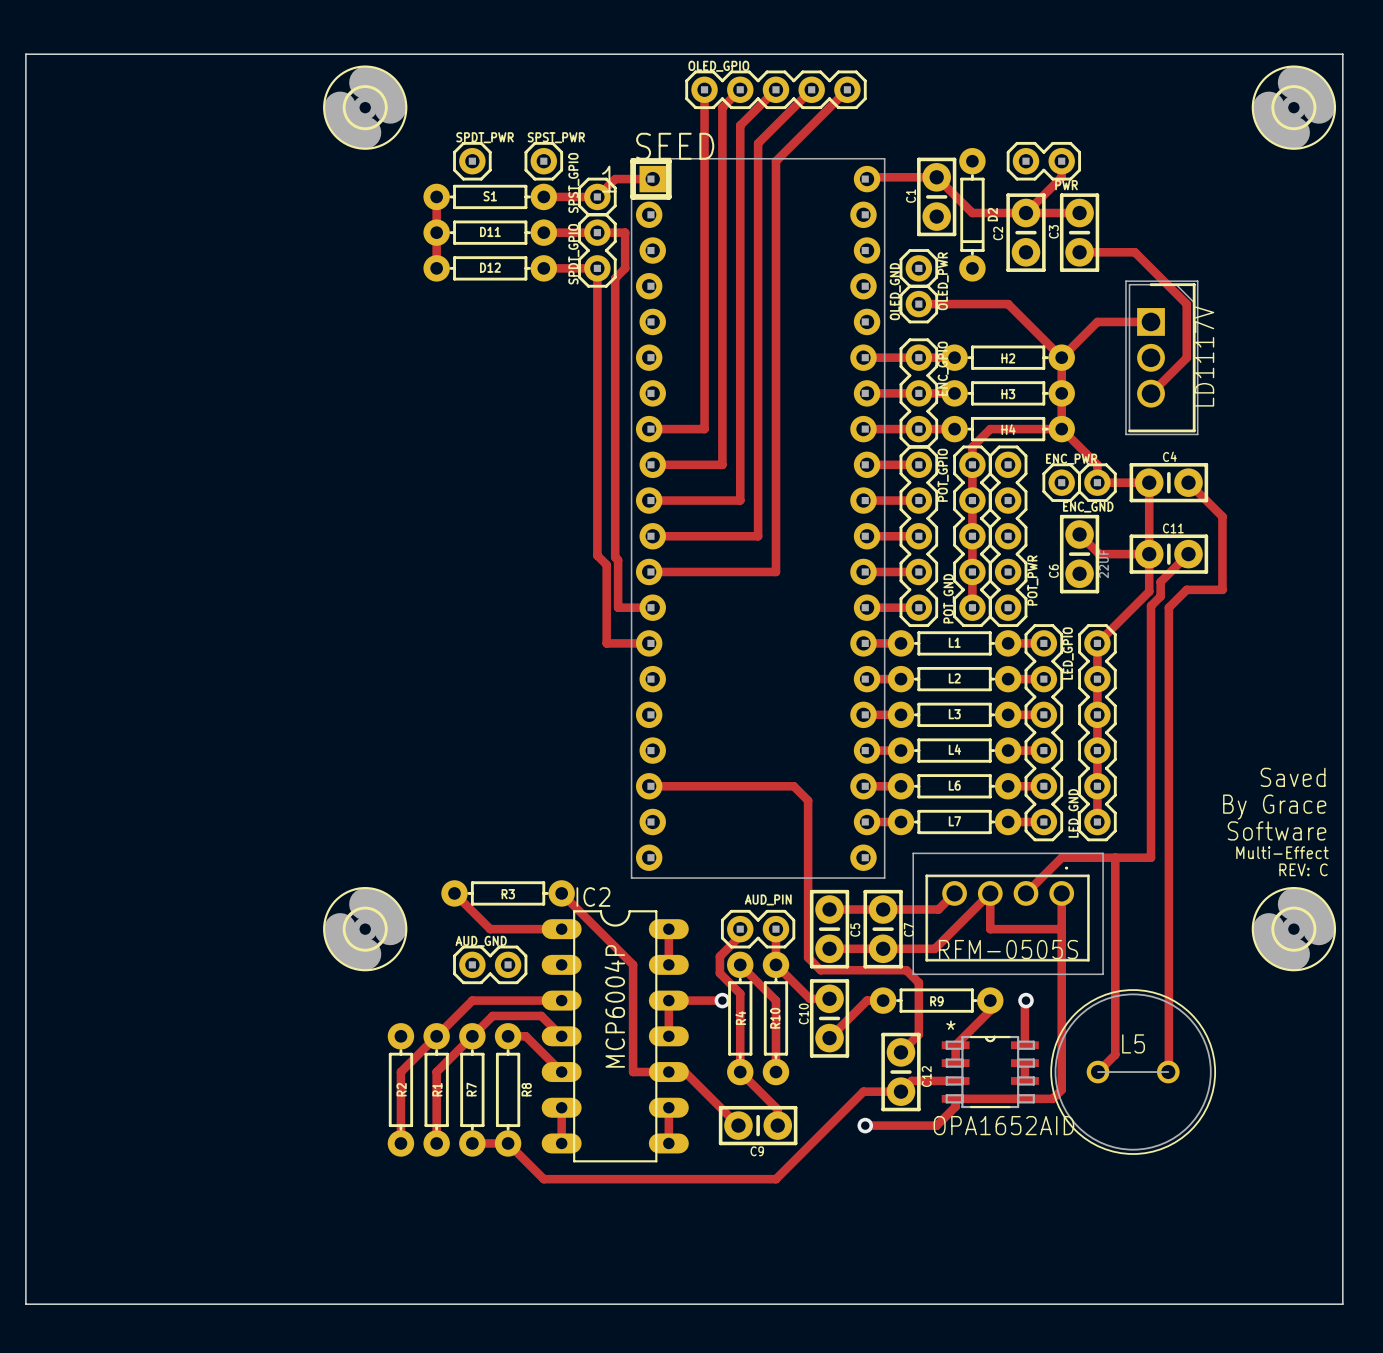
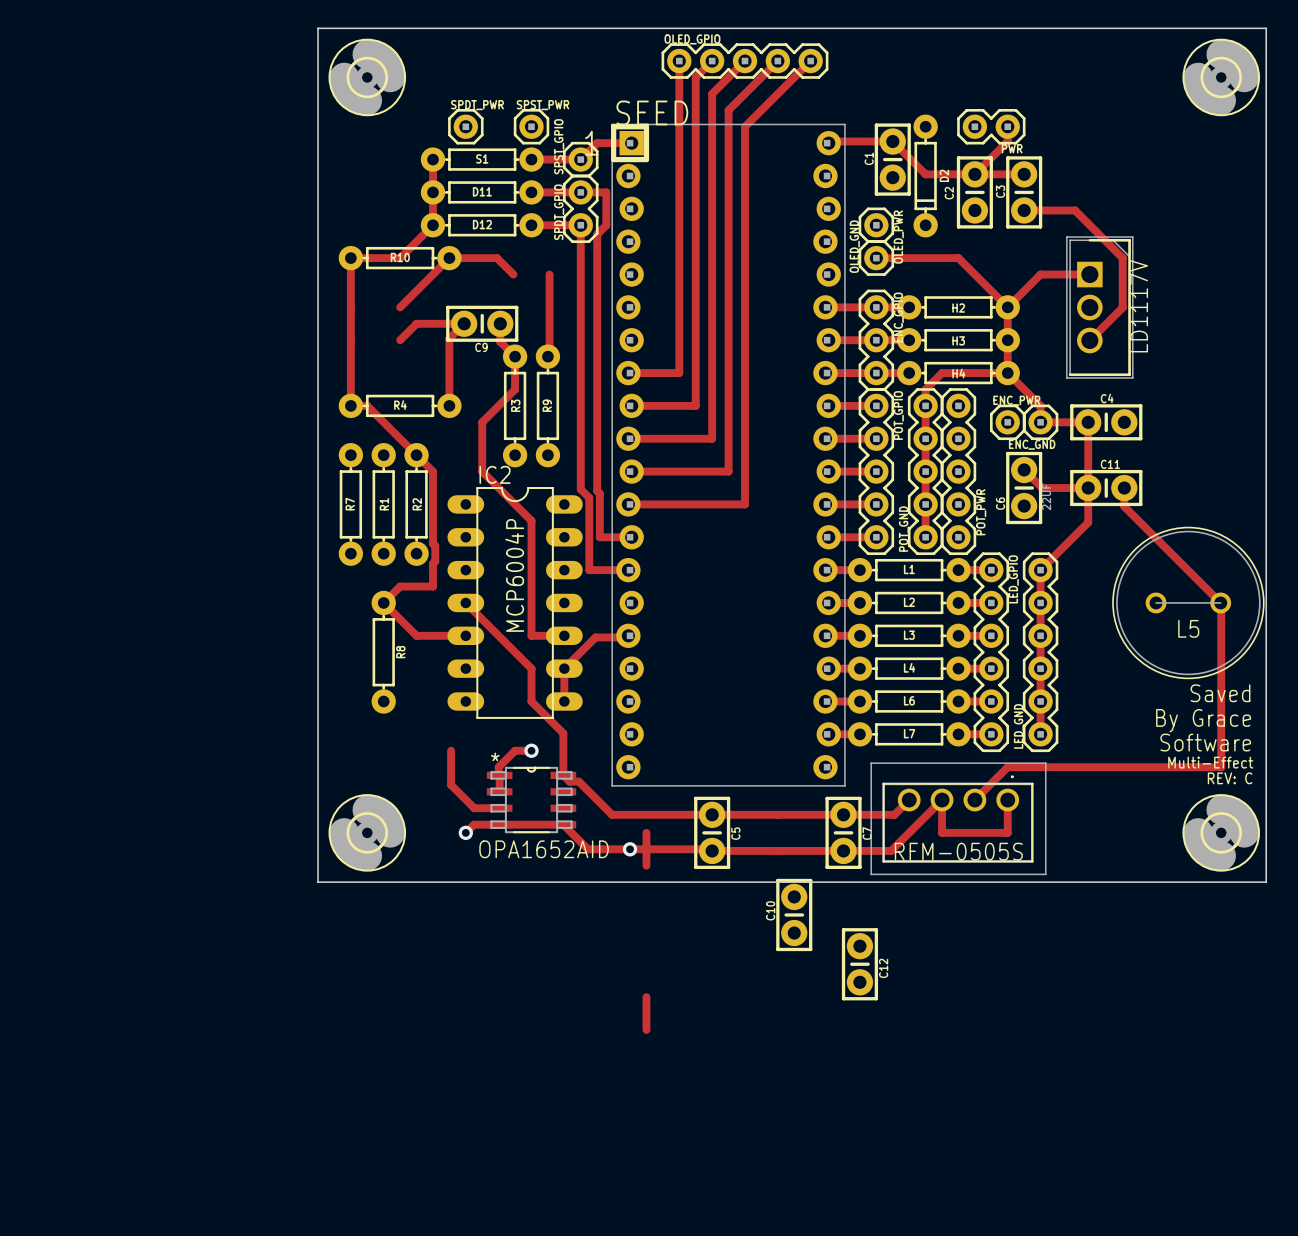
board edge: (311, 54) (25, 54) (25, 1304) (1342, 1304) (1342, 982) -> (318, 28) (318, 882) (1266, 882)
track: none -> (432, 225) (400, 258) (350, 258) (350, 405) (367, 405) (432, 471) (432, 543) (435, 545) (432, 586) (400, 586) (383, 602) (416, 635) (465, 635)
track: none -> (513, 274) (497, 258) (449, 258) (400, 307)
track: none -> (549, 274) (549, 355) (547, 356)
track: none -> (500, 323) (500, 341) (515, 356) (515, 389) (482, 422) (482, 471) (531, 520) (531, 635) (564, 635)
track: none -> (400, 340) (416, 323) (464, 323) (449, 338) (449, 405)
track: (1188, 482) (1222, 516) (1222, 589) (1186, 589) (1168, 607) (1168, 1072) -> none
track: (1188, 554) (1160, 581) (1160, 596) (1151, 606) (1151, 857) -> (1124, 488) (1124, 506) (1221, 603) (1221, 767) (1089, 767)
track: none -> (465, 602) (531, 668) (531, 701) (563, 733) (563, 775) (569, 781) (578, 781) (612, 814) (794, 814)
track: none -> (628, 635) (628, 637) (595, 637) (564, 668) (564, 701)
track: (649, 786) (793, 786) (808, 800) (808, 957) (820, 970) (906, 970) (918, 982) (918, 1034) (900, 1052) -> none
track: none -> (451, 750) (451, 784) (474, 808) (499, 808)
track: none -> (531, 750) (515, 750) (498, 767) (499, 791)
via: none -> (531, 750)
track: (1115, 857) (1115, 1054) (1098, 1072) -> none
track: (454, 893) (490, 929) (561, 929) -> none
R3 rotation: 0° (508, 893) -> 90° clockwise (515, 405)
R3 position: (508, 893) -> (515, 405)
part: none -> OPA1652AID (531, 799)
track: (561, 893) (633, 964) (633, 1072) (684, 1072) (738, 1125) -> none
track: none -> (465, 832) (474, 824) (563, 824) (588, 849) (794, 850)
via: none -> (465, 832)
track: (740, 929) (740, 936) (719, 956) (719, 973) (740, 993) (740, 1072) (777, 1109) (777, 1125) -> none
AUD_PIN: (758, 929) -> none
track: (775, 929) (775, 964) (809, 998) (829, 998) -> none
C5 position: (829, 929) -> (712, 832)
track: (1061, 929) (1061, 1089) (1052, 1098) (955, 1098) (955, 1106) (936, 1125) (865, 1125) -> none
via: none -> (630, 849)
AUD_GND: (490, 964) -> none
track: (740, 964) (775, 1000) (775, 1072) -> none
track: (561, 1000) (472, 1000) (400, 1072) (400, 1143) -> none
track: (722, 1000) (668, 1000) (668, 1036) -> none
via: (722, 1000) -> none
track: (883, 1000) (867, 1000) (829, 1038) -> none
R9 rotation: 0° (936, 1000) -> 90° clockwise (547, 405)
R9 position: (936, 1000) -> (547, 405)
track: (990, 1000) (990, 1010) (955, 1045) (955, 1063) -> none
track: (1026, 1000) (1024, 1045) -> none
via: (1026, 1000) -> none
R4 rotation: 0° (740, 1018) -> 90° clockwise (400, 405)
R4 position: (740, 1018) -> (400, 405)
R10 rotation: 0° (775, 1018) -> 90° clockwise (400, 258)
R10 position: (775, 1018) -> (400, 258)
track: (508, 1036) (525, 1036) (561, 1072) -> none
track: (561, 1036) (541, 1015) (492, 1015) (436, 1072) (436, 1143) -> none
IC2 position: (615, 1036) -> (515, 602)
L5 name position: L5 (1133, 1043) -> L5 (1188, 628)
track: (1024, 1063) (1024, 1080) -> none
part: OPA1652AID (990, 1071) -> none
L5 position: (1133, 1072) -> (1188, 602)
track: (955, 1080) (911, 1080) (900, 1091) (863, 1091) (775, 1179) (543, 1179) (508, 1143) (472, 1143) -> none
R2 position: (400, 1089) -> (416, 504)
R1 position: (436, 1089) -> (383, 504)
R7 position: (472, 1089) -> (350, 504)
R8 position: (508, 1089) -> (383, 652)
track: (561, 1107) (561, 1143) -> none
C9 position: (758, 1125) -> (482, 323)
via: (865, 1125) -> none

